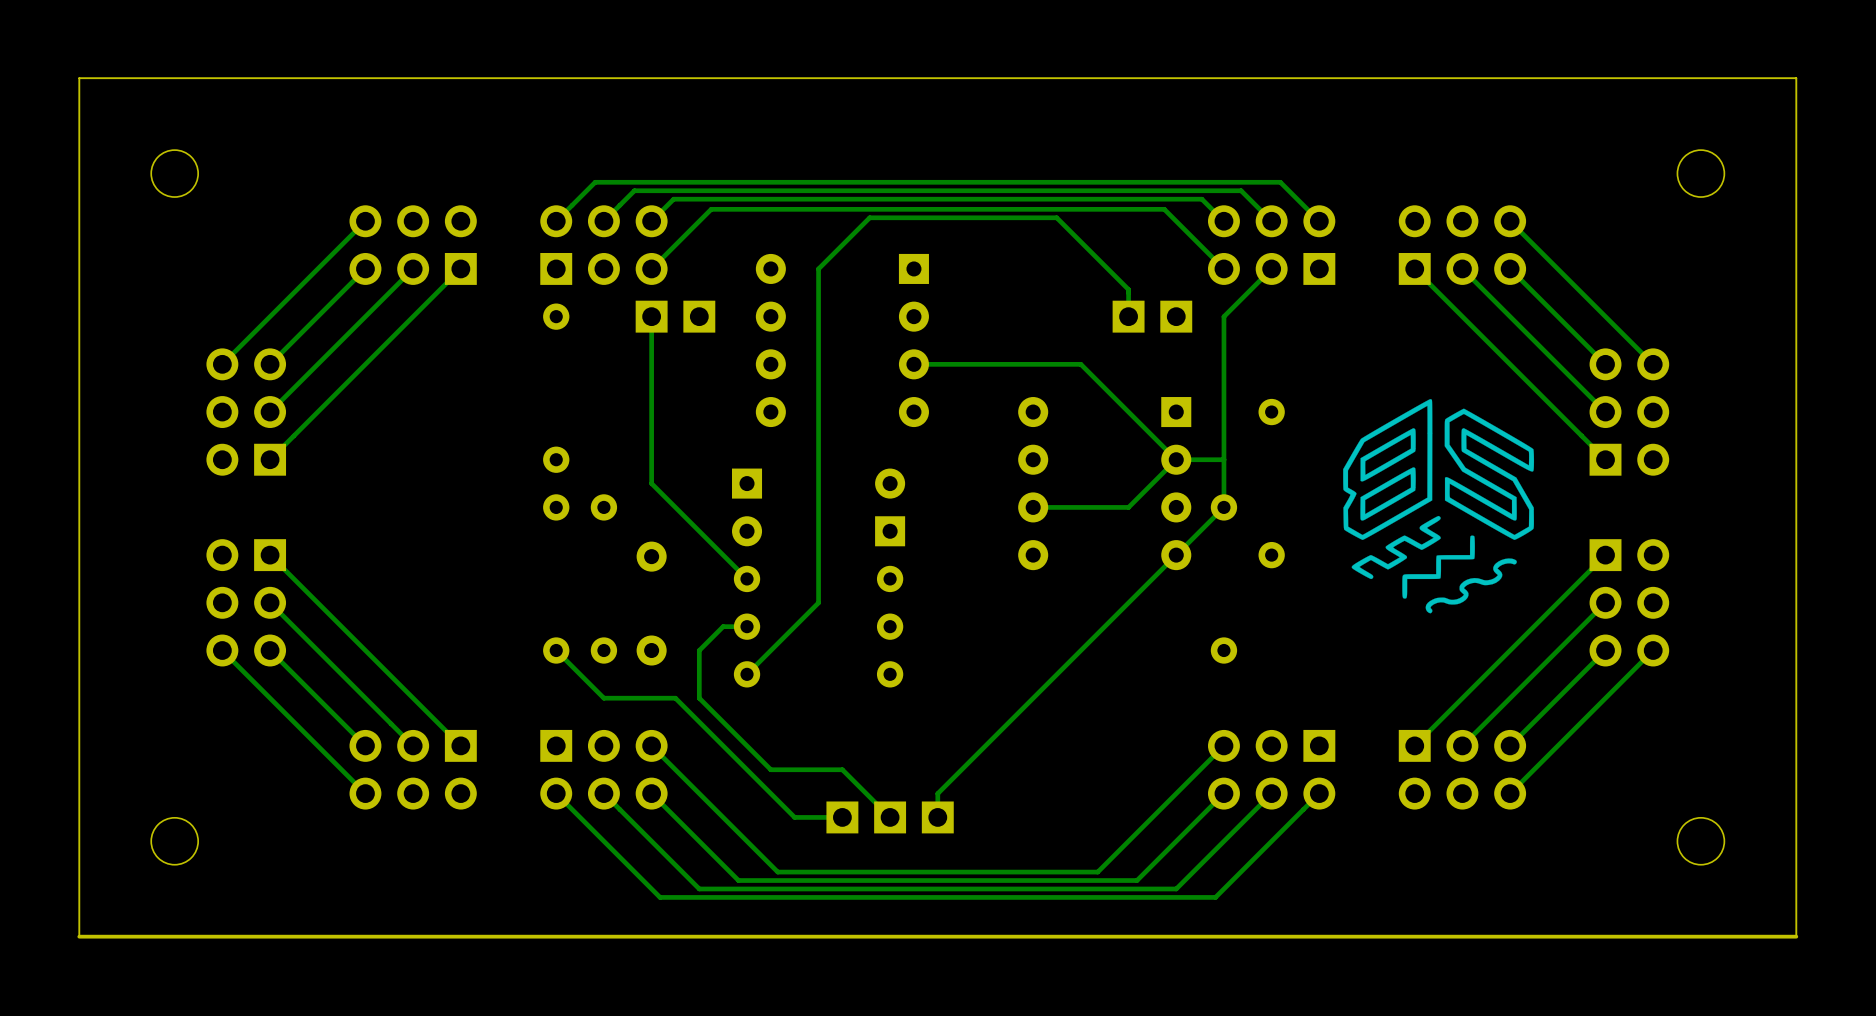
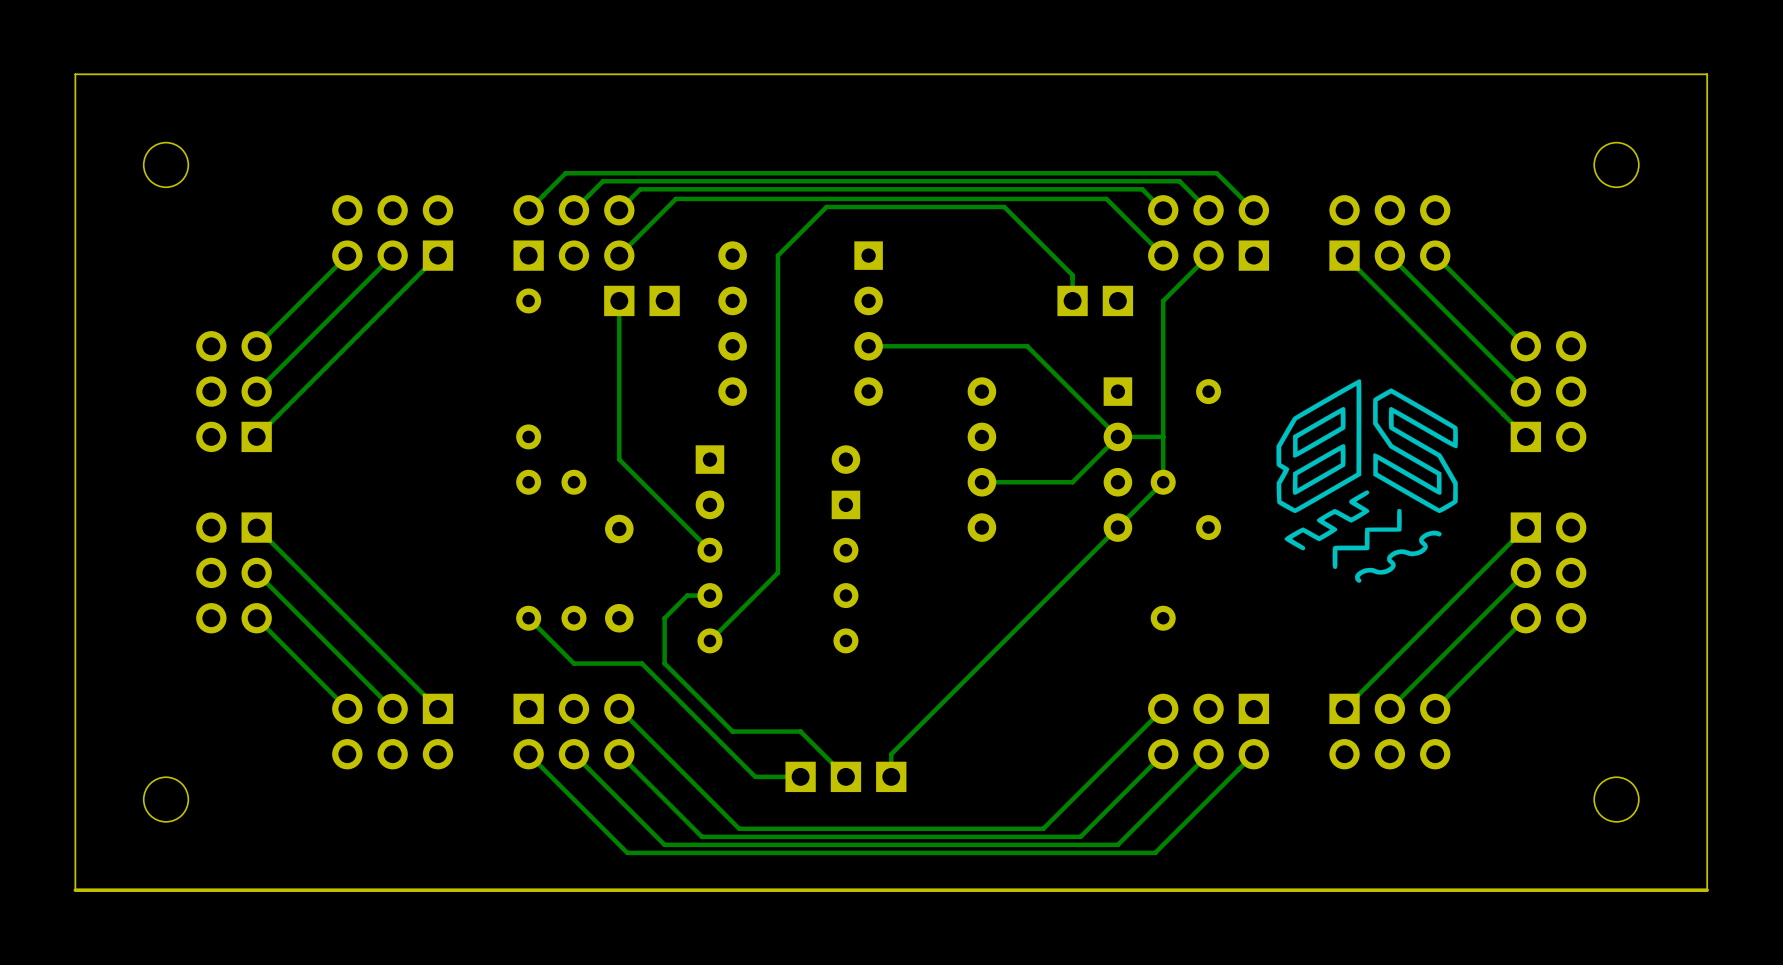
track: (365, 221) (222, 364) -> none
track: (1510, 221) (1653, 364) -> none
track: (222, 650) (365, 793) -> none
track: (1653, 650) (1510, 793) -> none

